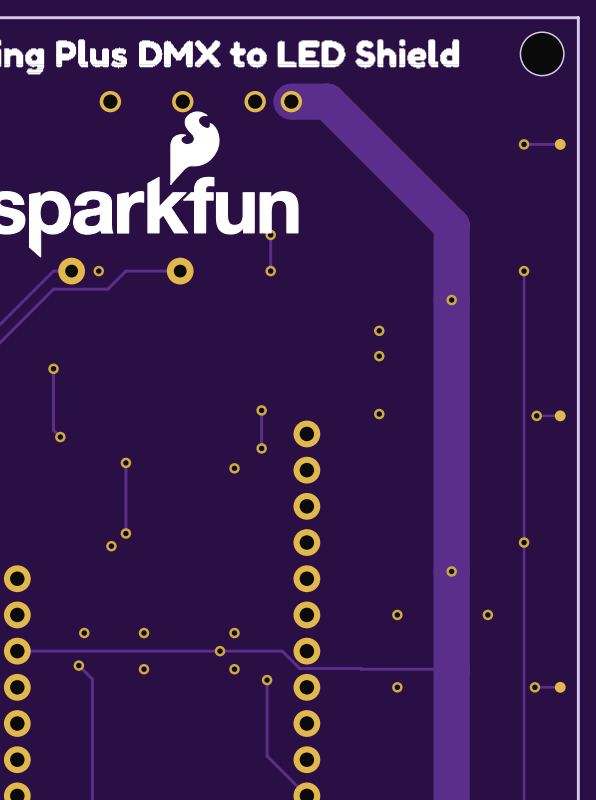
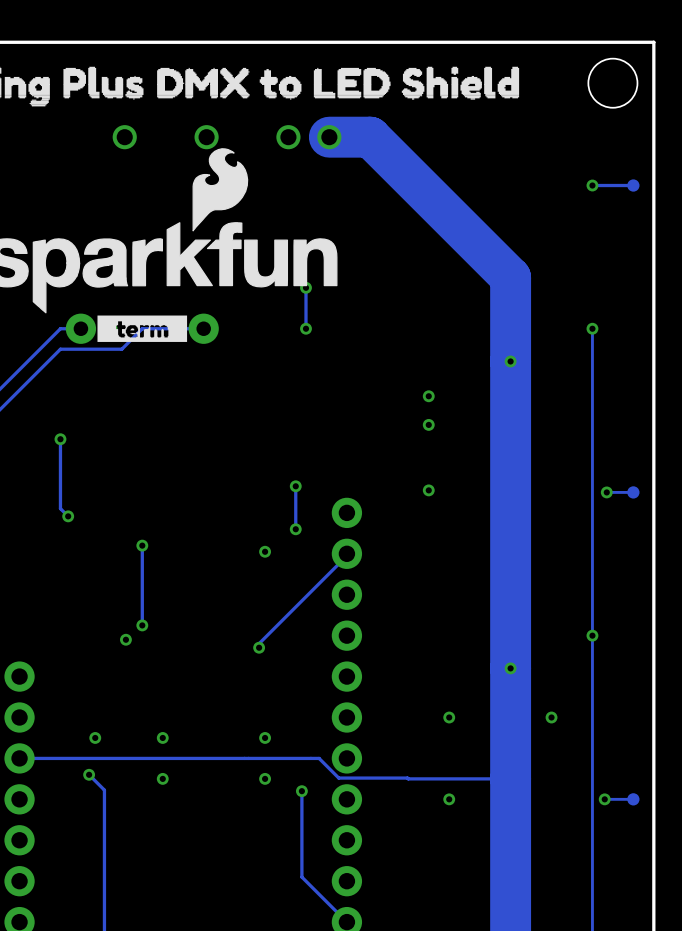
drawing: none -> [97, 315, 188, 342]
track: none -> (348, 553) (259, 643) (259, 647)
via: none -> (259, 647)
via: (220, 651) -> none

